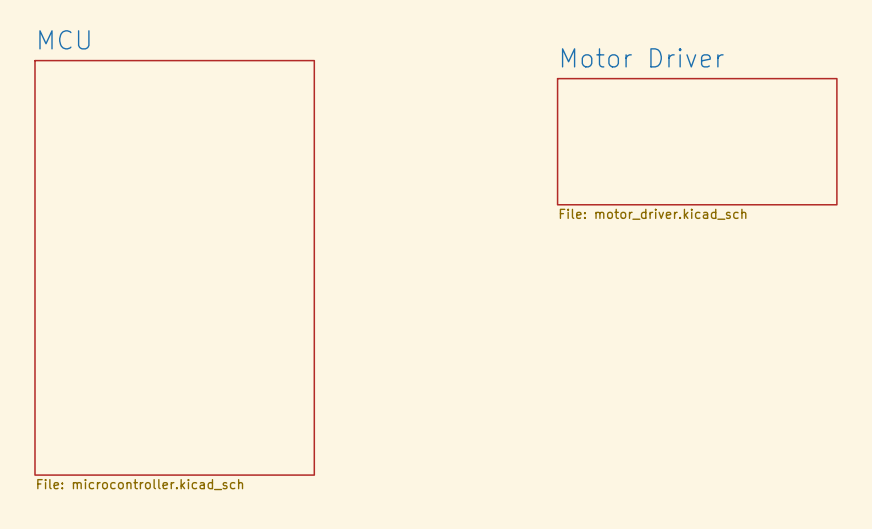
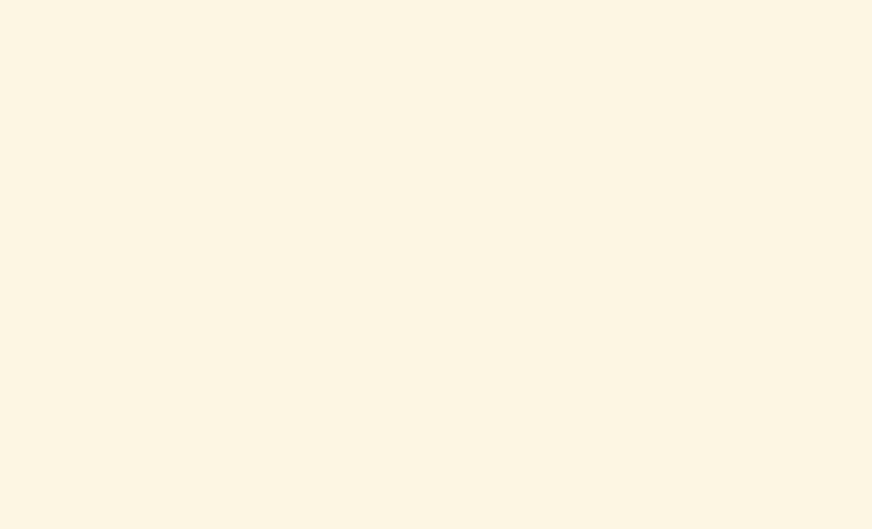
sheet Motor Driver: File: motor_driver.kicad_sch (697, 141) -> none
sheet MCU: File: microcontroller.kicad_sch (174, 267) -> none

